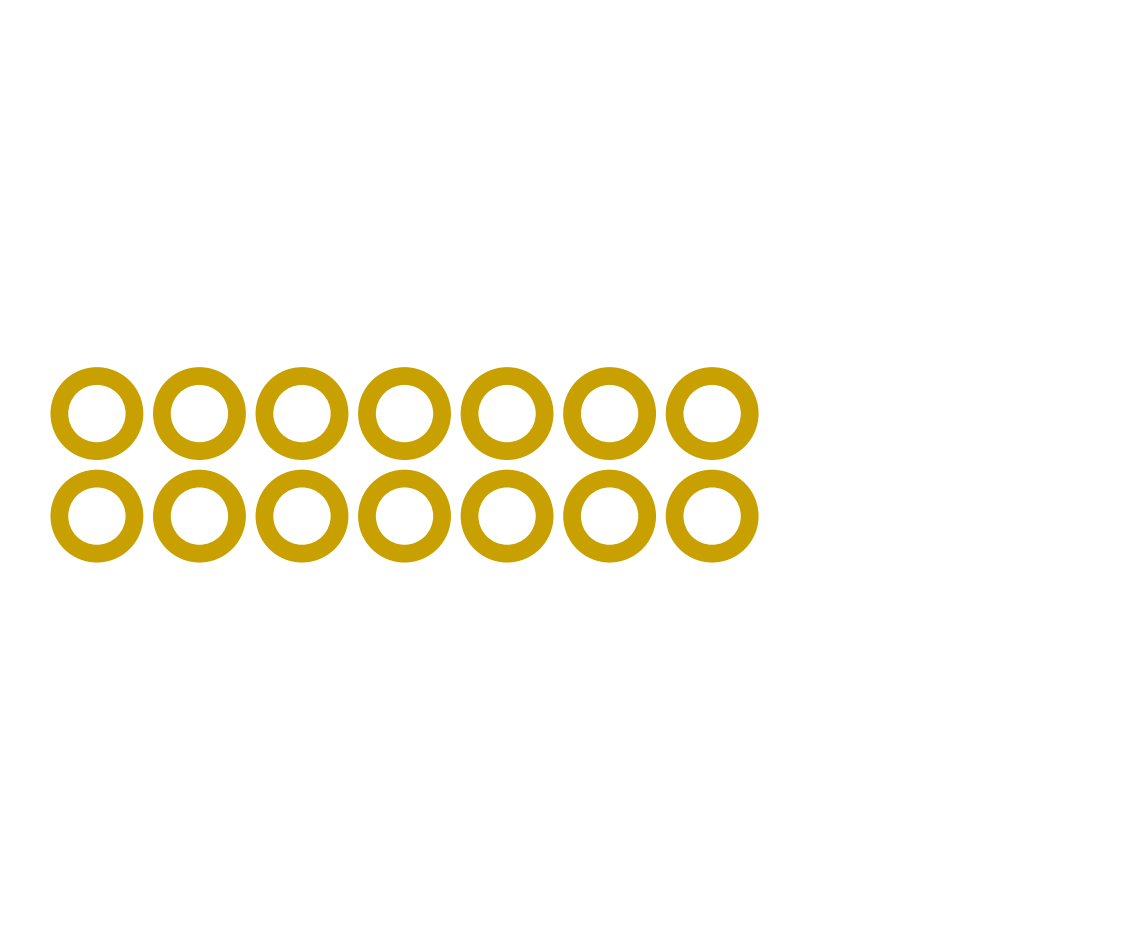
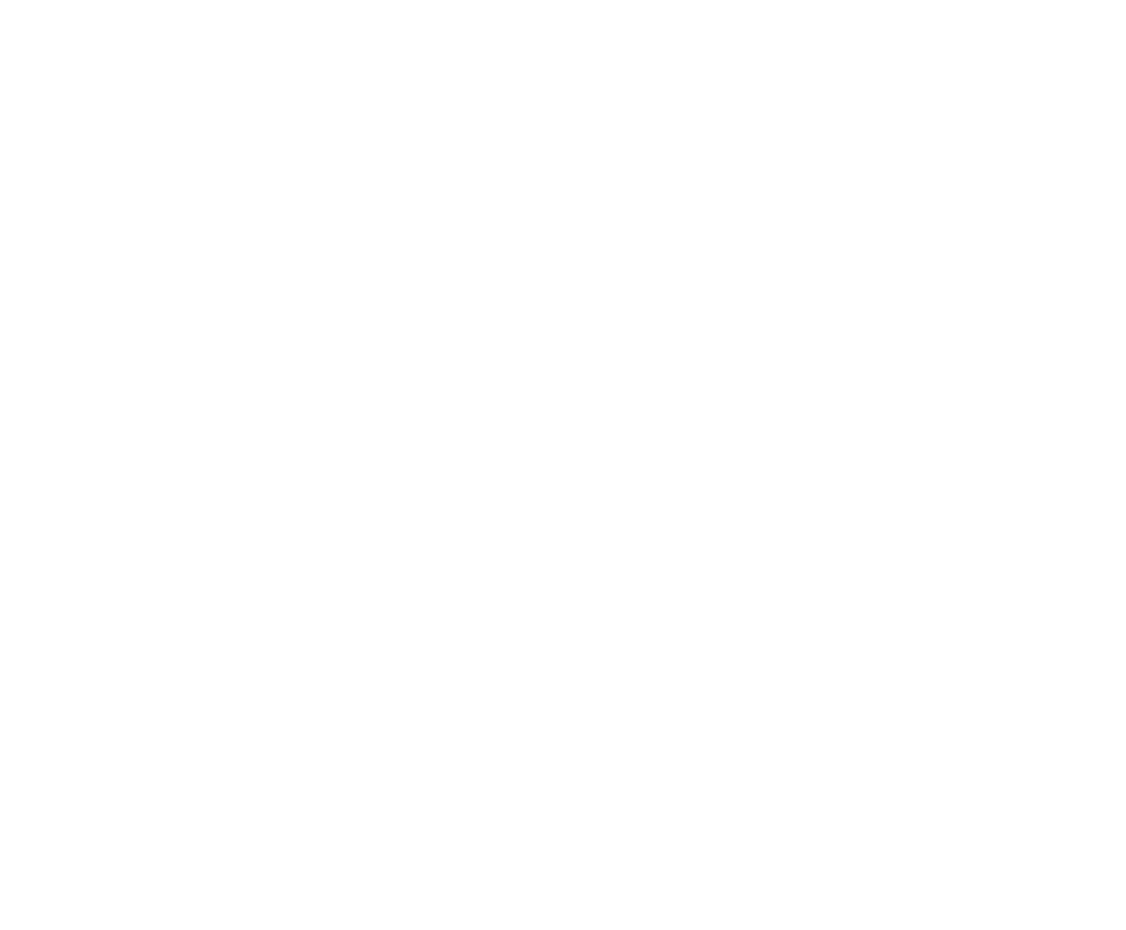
part: (404, 464) -> none

